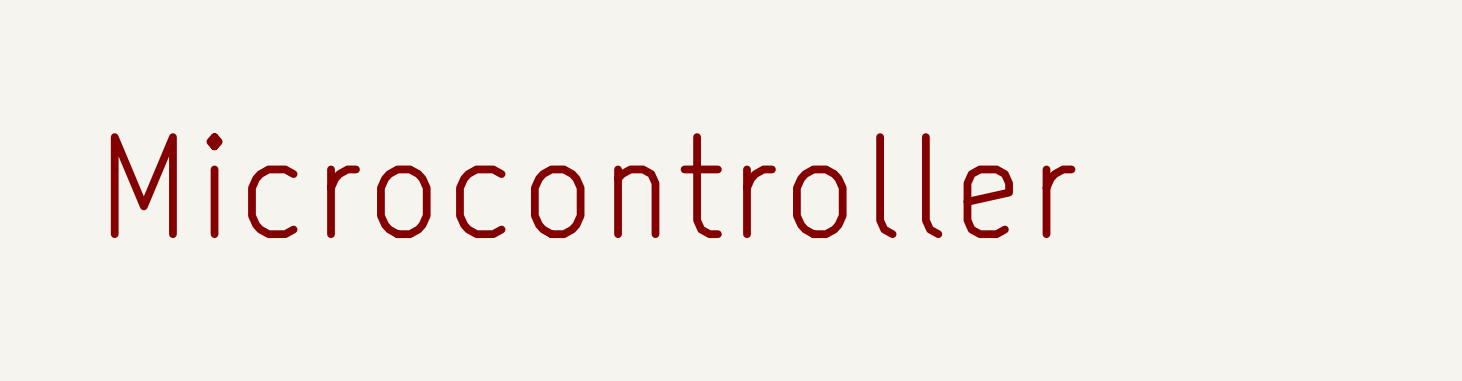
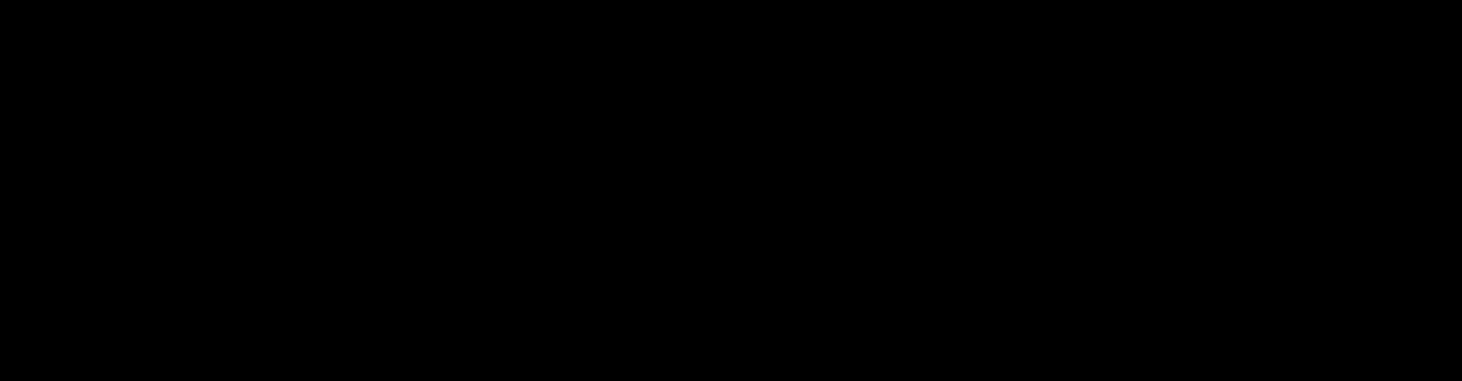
text: Microcontroller (593, 185) -> none

